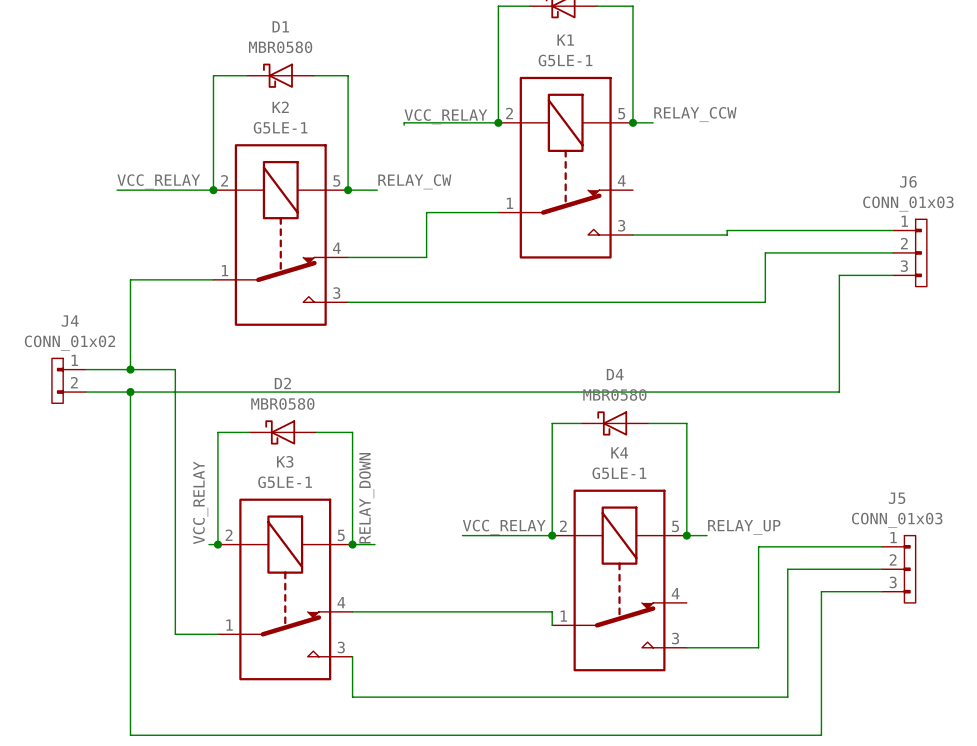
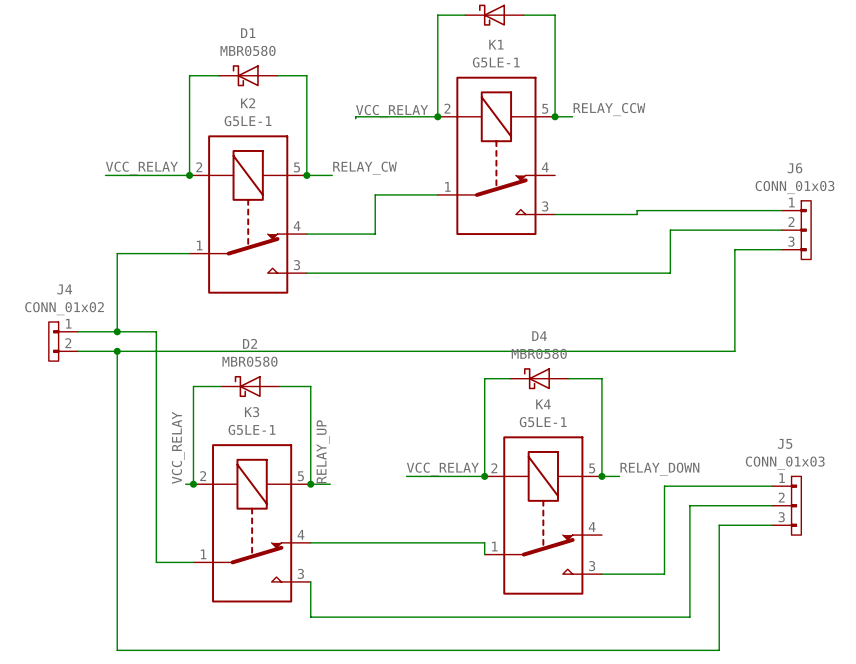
label: RELAY_DOWN (366, 498) -> RELAY_UP (323, 451)
label: RELAY_UP (744, 527) -> RELAY_DOWN (659, 469)

